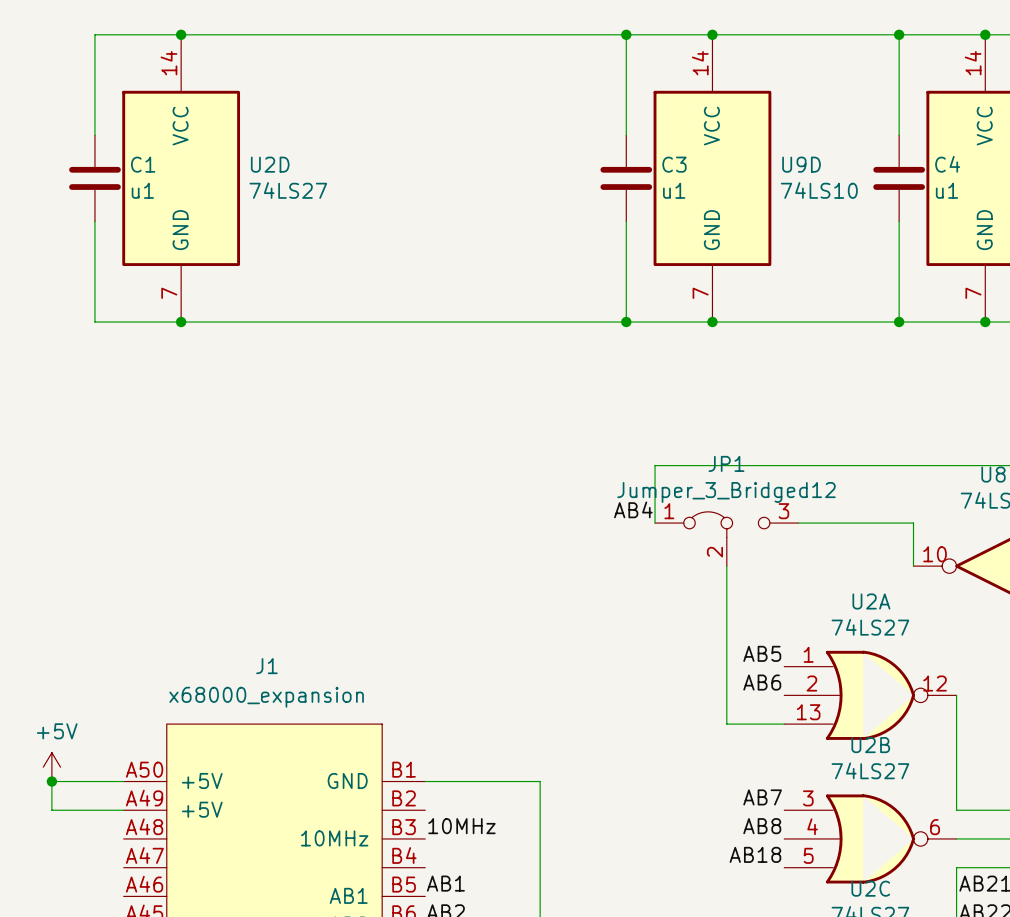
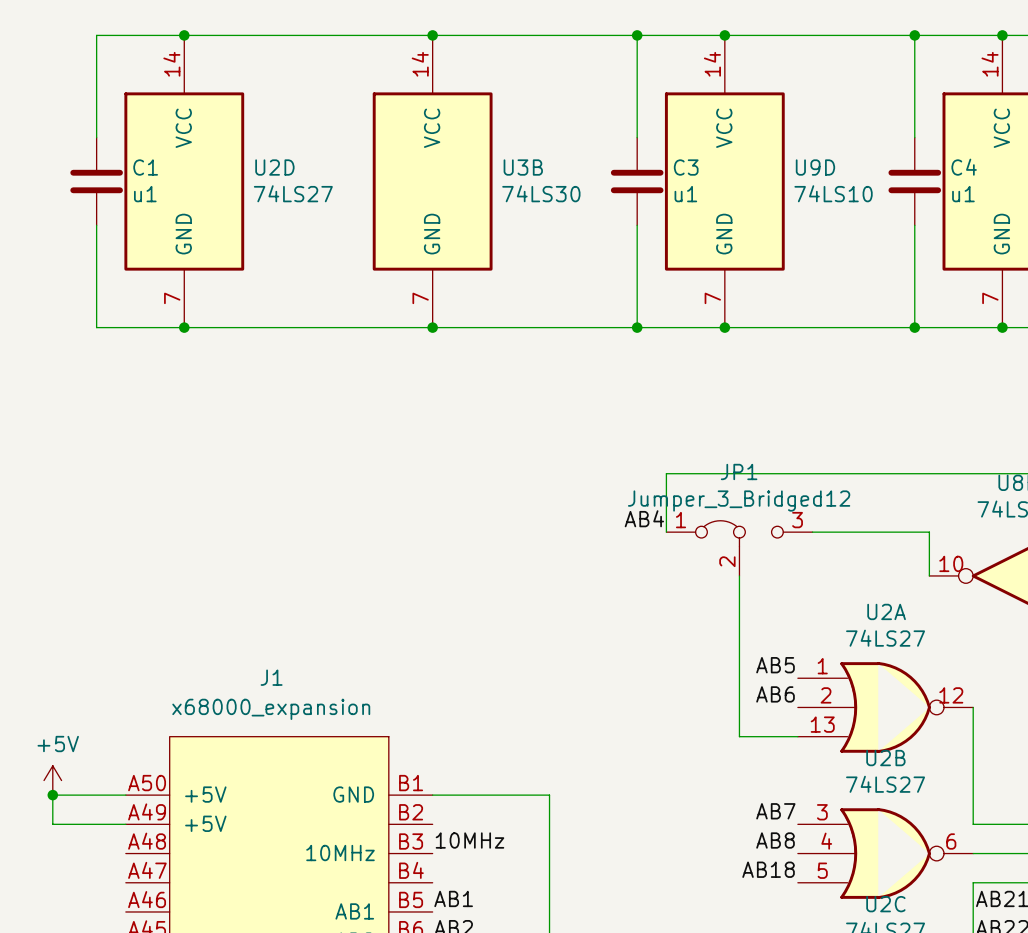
junction: none -> (432, 35)
U3B: none -> 74LS30 (432, 181)
junction: none -> (432, 327)

